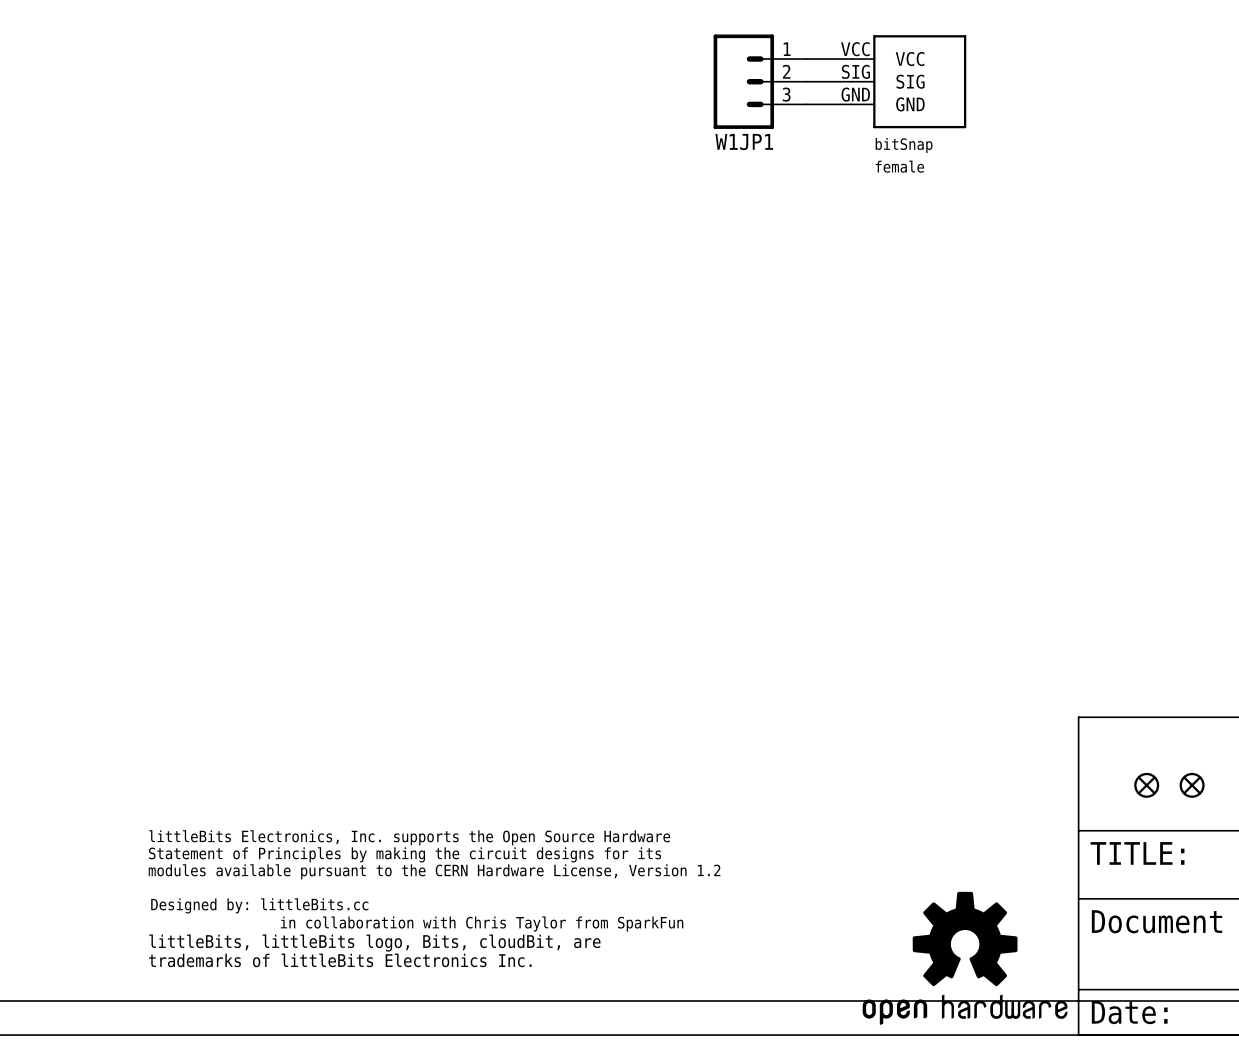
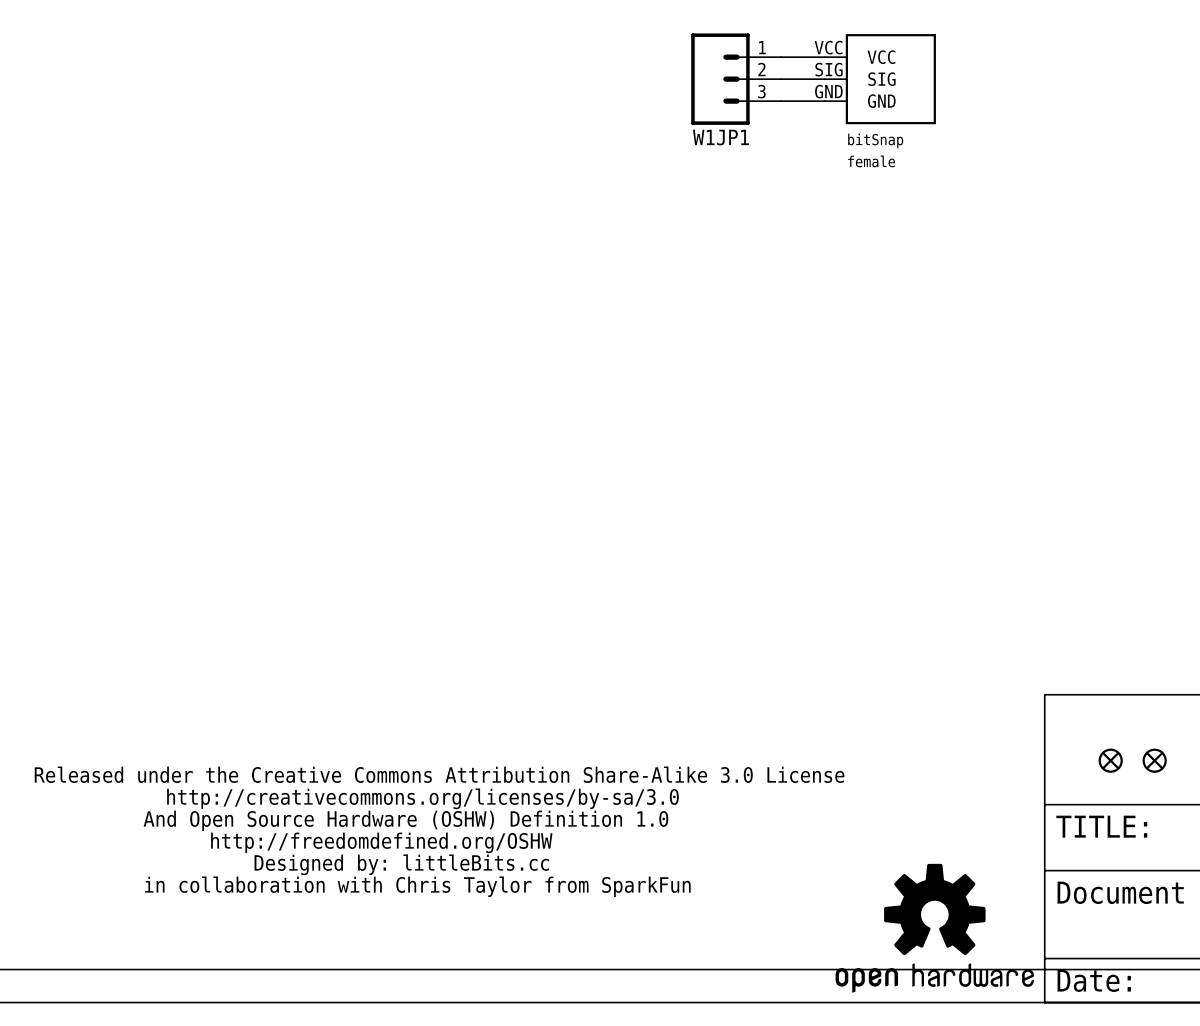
part: none -> (439, 831)
part: (434, 898) -> none
text: in collaboration with Chris Taylor from SparkFun (482, 924) -> none

